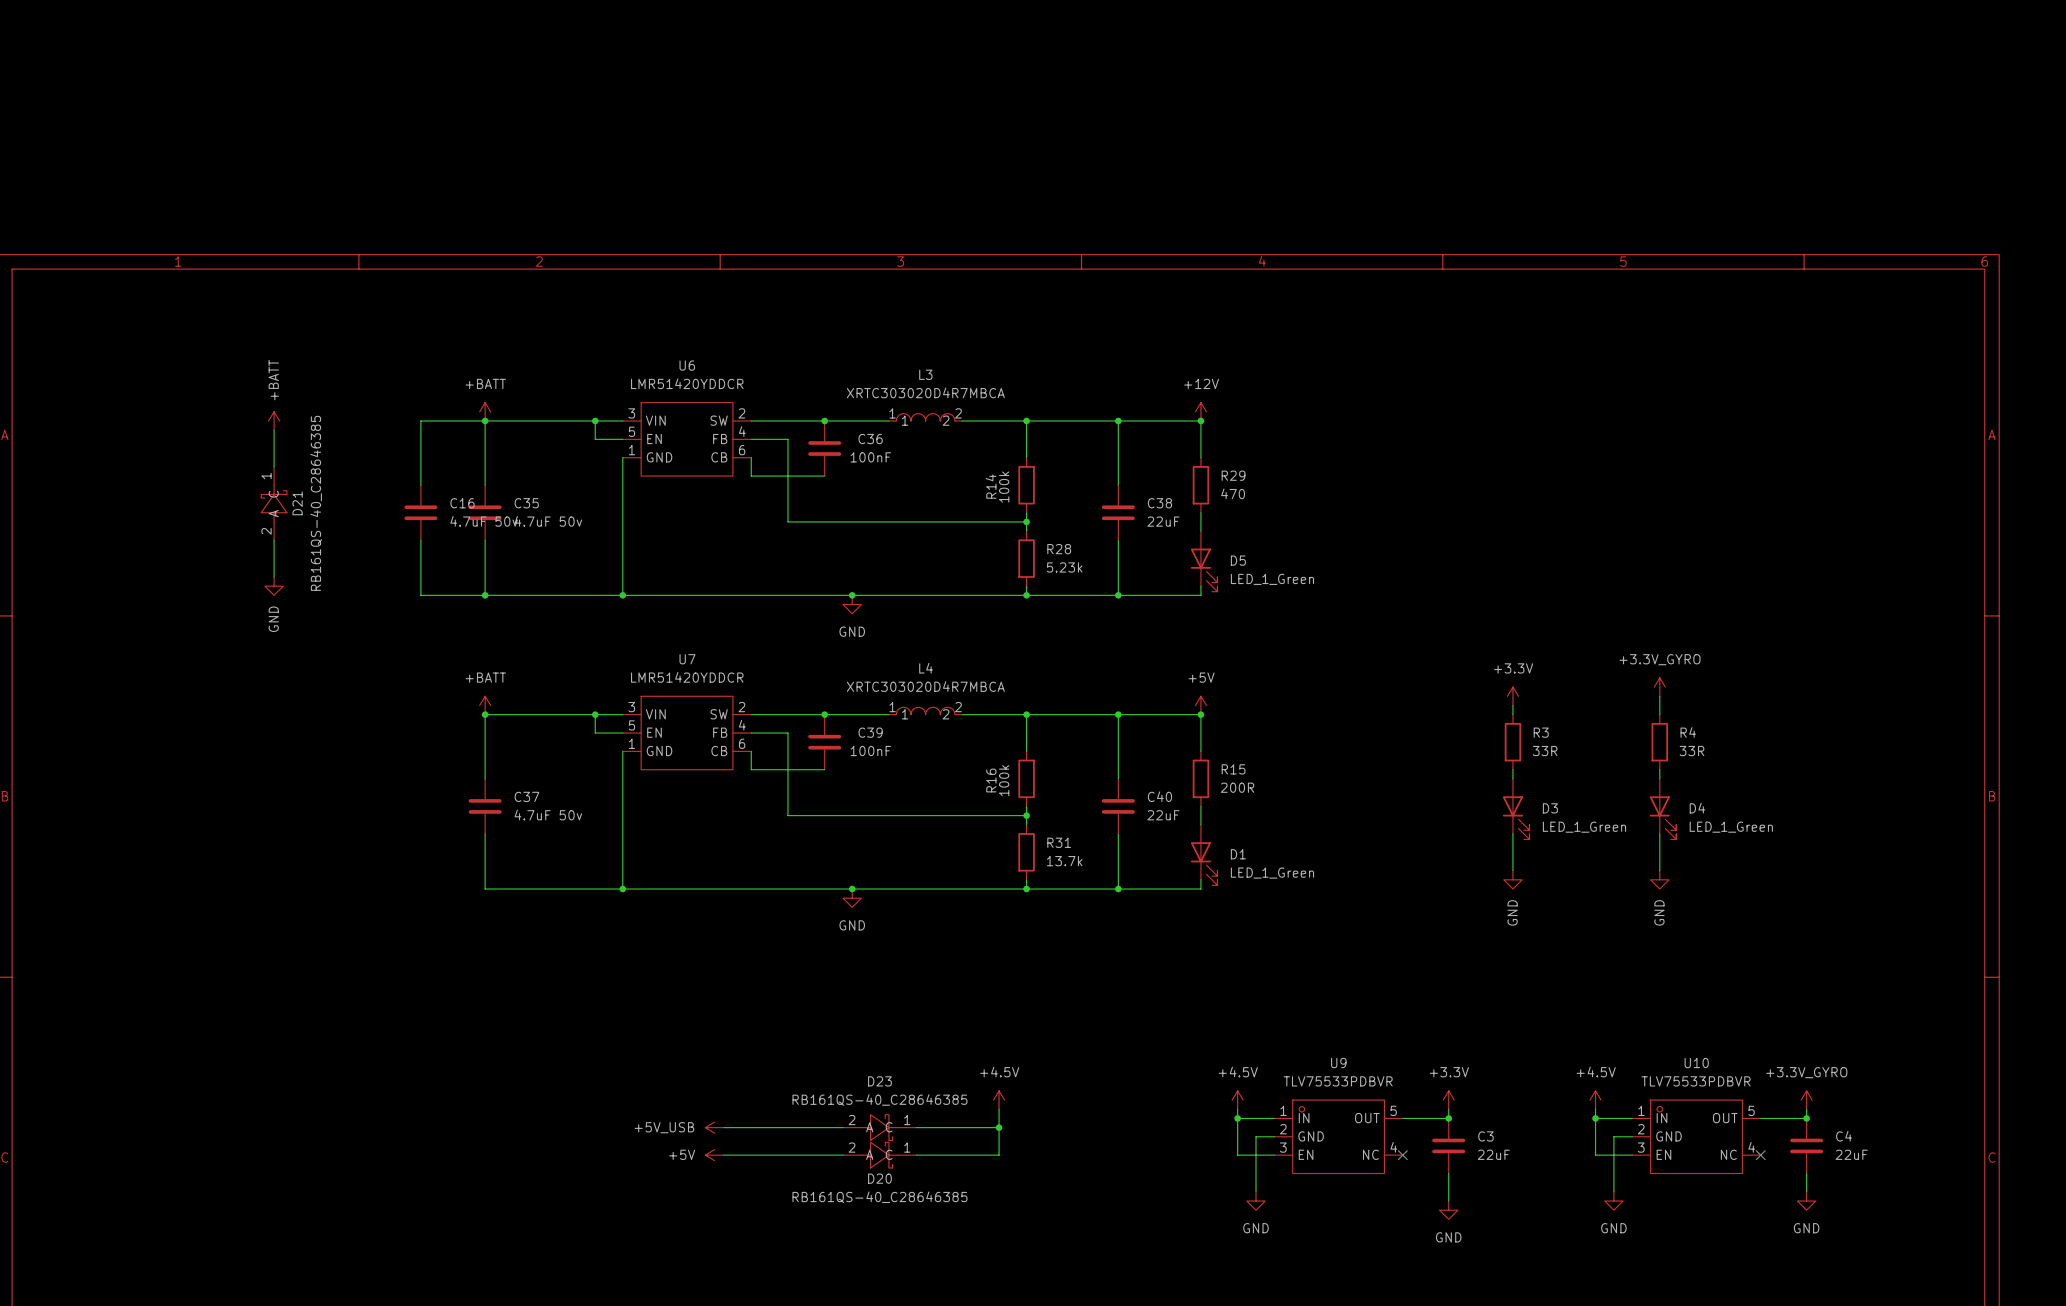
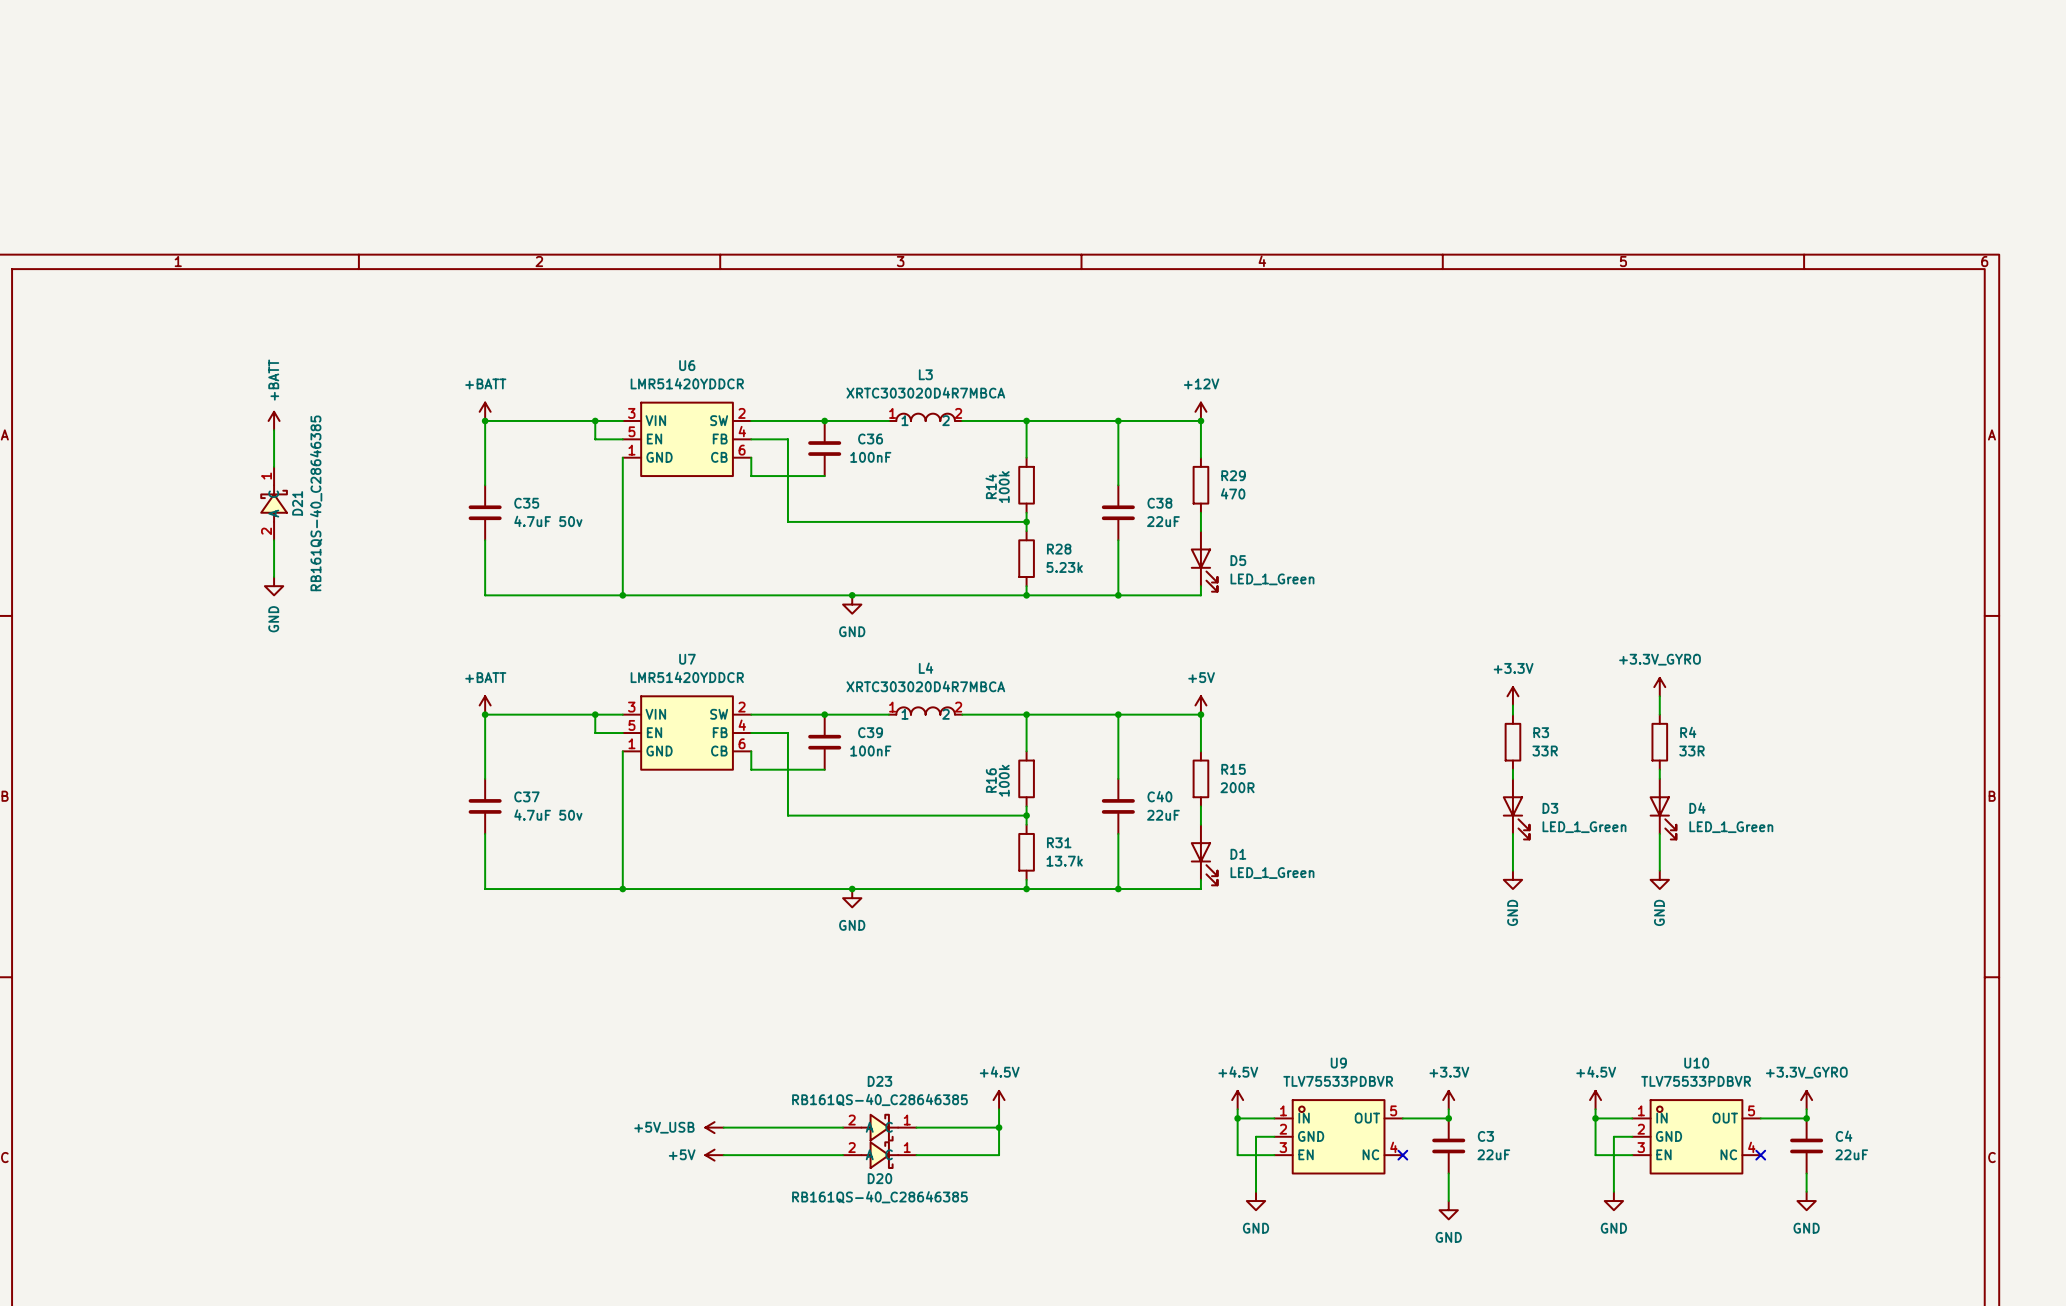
wire: (485, 420) (420, 420) (420, 485) -> none
C16: 4.7uF 50v (420, 512) -> none
wire: (420, 540) (420, 595) (485, 595) -> none
junction: (485, 595) -> none

